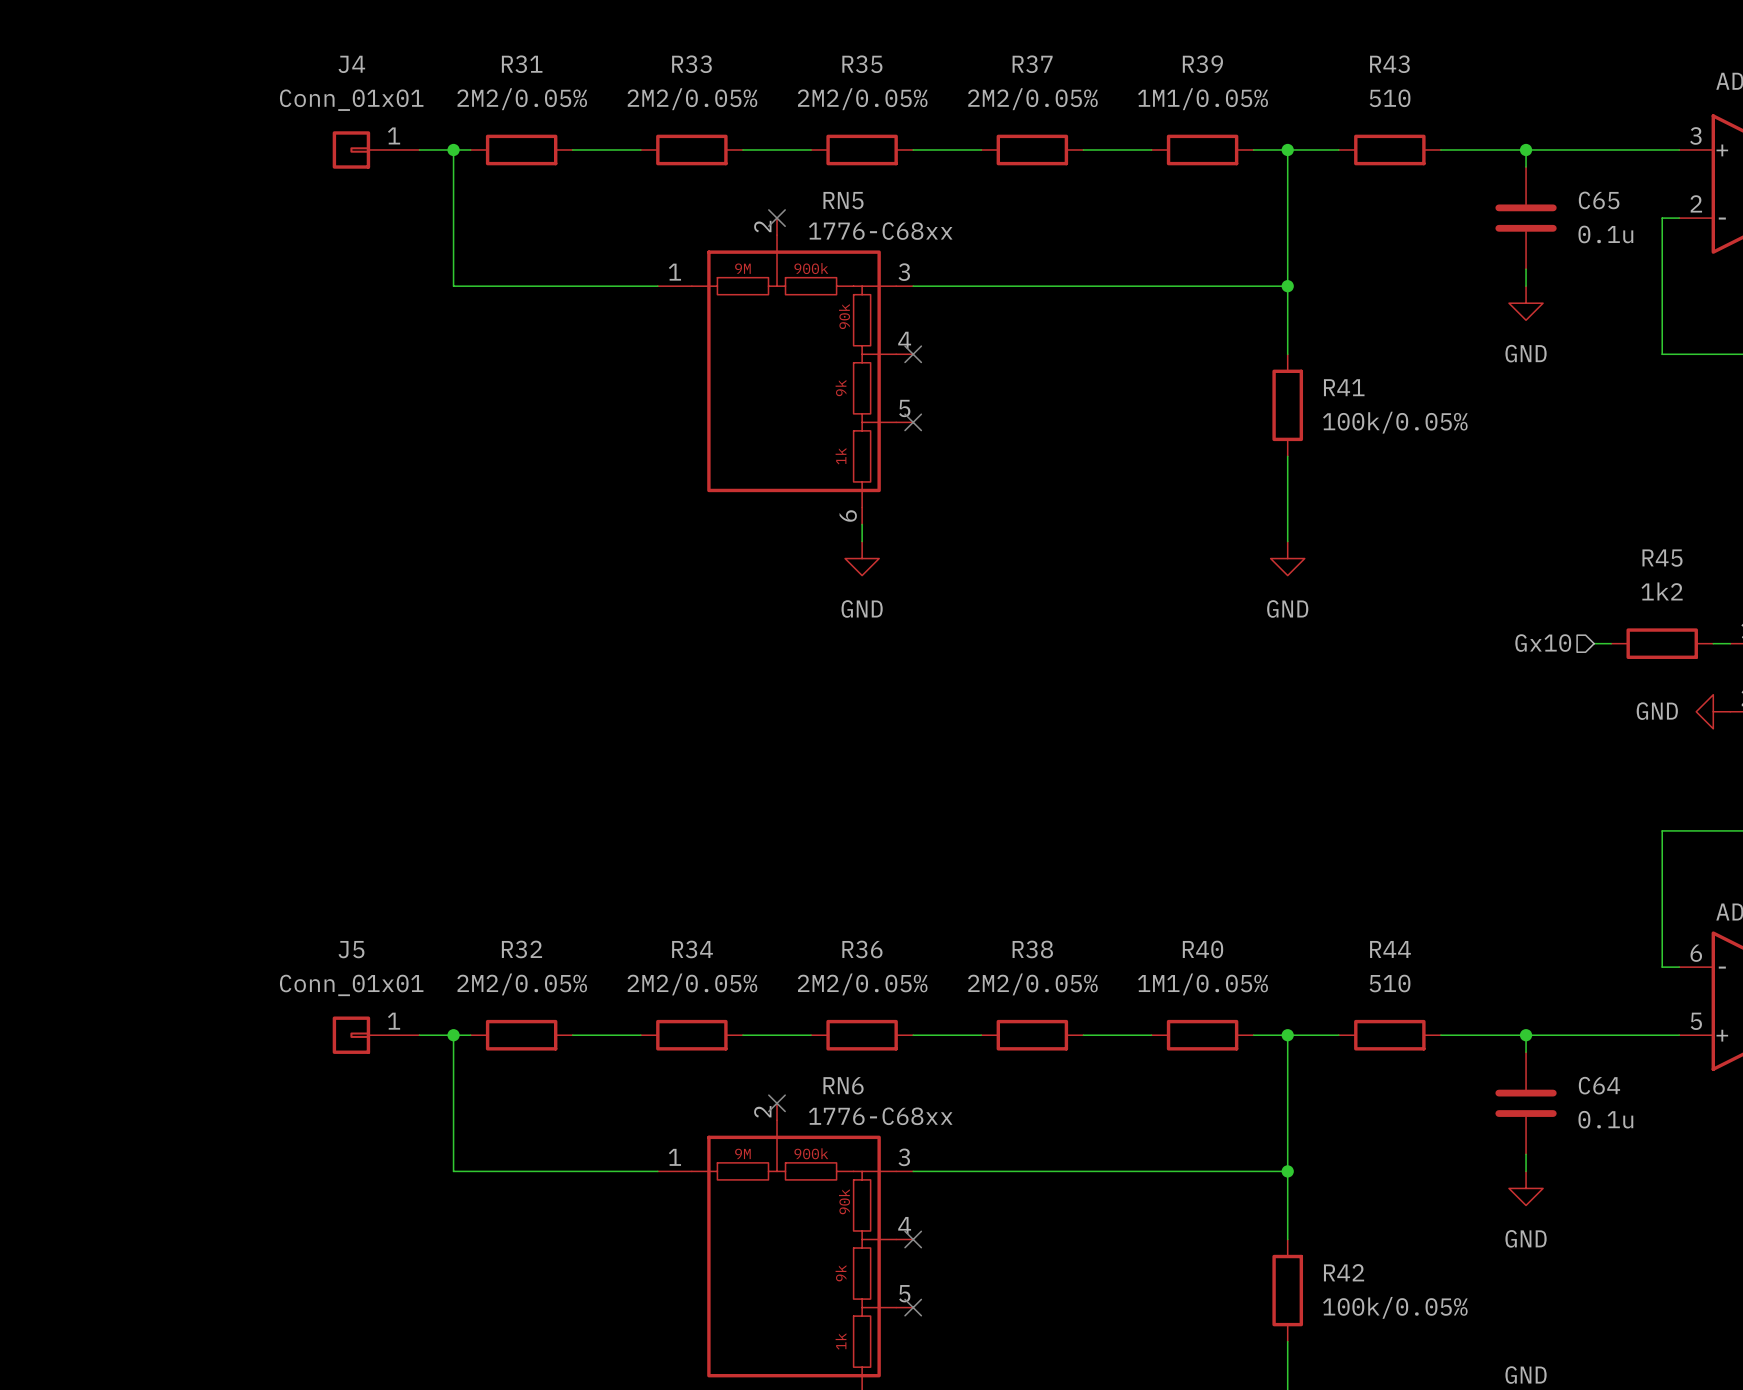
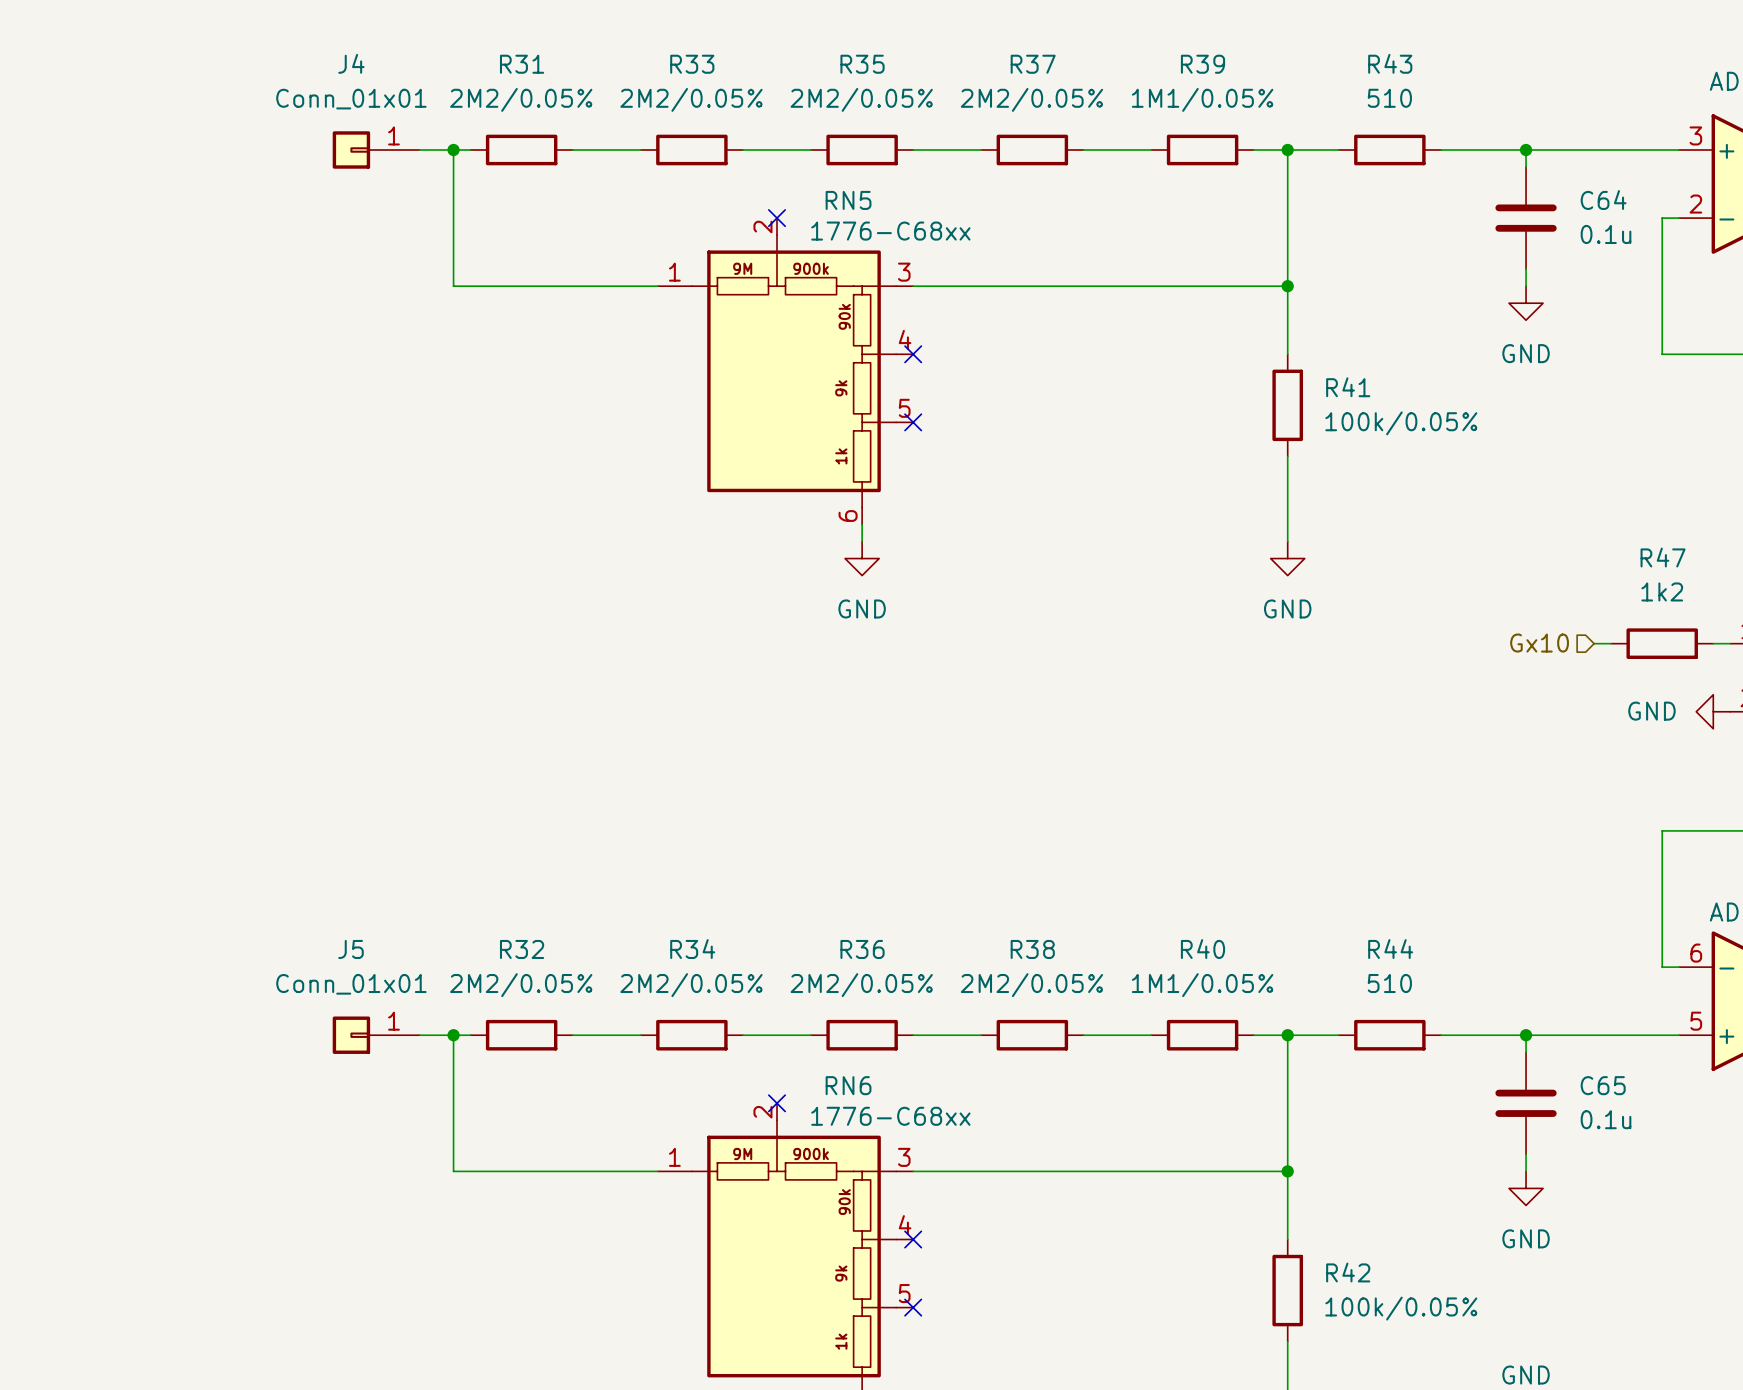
C65 name: C65 (1599, 200) -> C64 (1603, 200)
R45 name: R45 (1662, 558) -> R47 (1663, 557)
C64 name: C64 (1599, 1085) -> C65 (1603, 1085)

